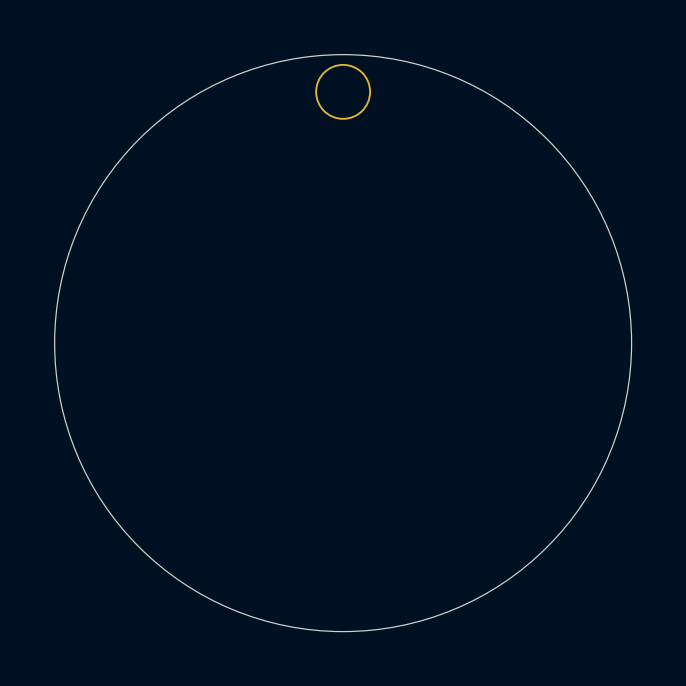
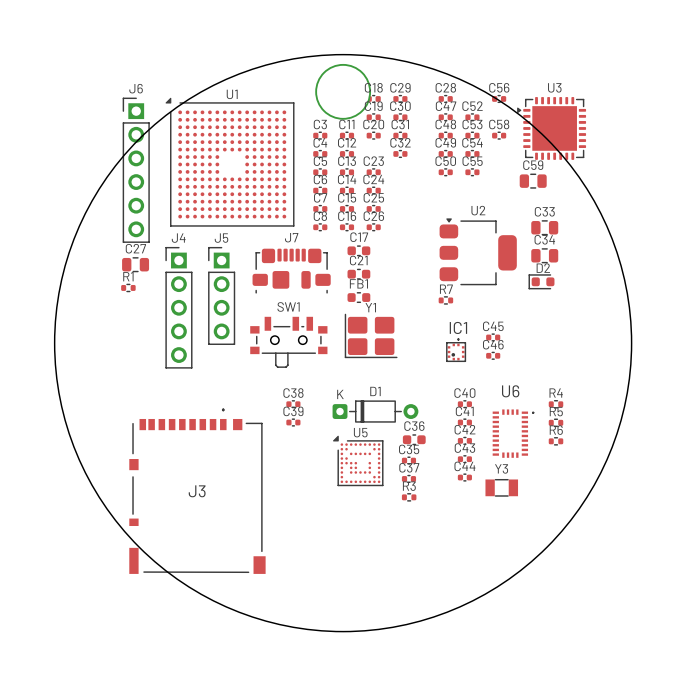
C18: none -> (373, 98)
C29: none -> (400, 98)
C28: none -> (445, 98)
C56: none -> (499, 98)
C19: none -> (373, 117)
C30: none -> (400, 117)
C47: none -> (445, 117)
C52: none -> (472, 117)
U3: none -> (551, 128)
C3: none -> (320, 135)
C11: none -> (346, 135)
C20: none -> (373, 135)
C31: none -> (400, 135)
C48: none -> (445, 135)
C53: none -> (472, 135)
C58: none -> (499, 135)
C4: none -> (320, 153)
C12: none -> (346, 153)
C32: none -> (400, 153)
C49: none -> (445, 153)
C54: none -> (472, 153)
U1: none -> (229, 162)
J6: none -> (136, 170)
C5: none -> (320, 172)
C13: none -> (346, 172)
C23: none -> (373, 172)
C50: none -> (445, 172)
C55: none -> (472, 172)
C59: none -> (533, 181)
C6: none -> (320, 190)
C14: none -> (346, 190)
C24: none -> (373, 190)
C7: none -> (320, 208)
C15: none -> (346, 208)
C25: none -> (373, 208)
C8: none -> (320, 227)
C16: none -> (346, 227)
C26: none -> (373, 227)
C33: none -> (544, 227)
C17: none -> (358, 250)
U2: none -> (478, 251)
C34: none -> (544, 255)
C27: none -> (135, 264)
J7: none -> (291, 271)
C21: none -> (358, 274)
D2: none -> (541, 281)
R1: none -> (128, 287)
J5: none -> (221, 295)
FB1: none -> (358, 297)
R7: none -> (445, 300)
J4: none -> (178, 307)
Y1: none -> (371, 335)
C45: none -> (493, 337)
SW1: none -> (288, 342)
IC1: none -> (456, 350)
C46: none -> (493, 355)
C38: none -> (293, 404)
C40: none -> (464, 404)
R4: none -> (556, 404)
D1: none -> (375, 411)
C39: none -> (293, 422)
C41: none -> (464, 422)
R5: none -> (556, 422)
U6: none -> (513, 433)
C36: none -> (414, 439)
C42: none -> (464, 440)
R6: none -> (556, 441)
C43: none -> (464, 459)
U5: none -> (358, 460)
C35: none -> (408, 460)
C44: none -> (464, 477)
C37: none -> (408, 478)
Y3: none -> (501, 487)
J3: none -> (197, 491)
R3: none -> (409, 497)

